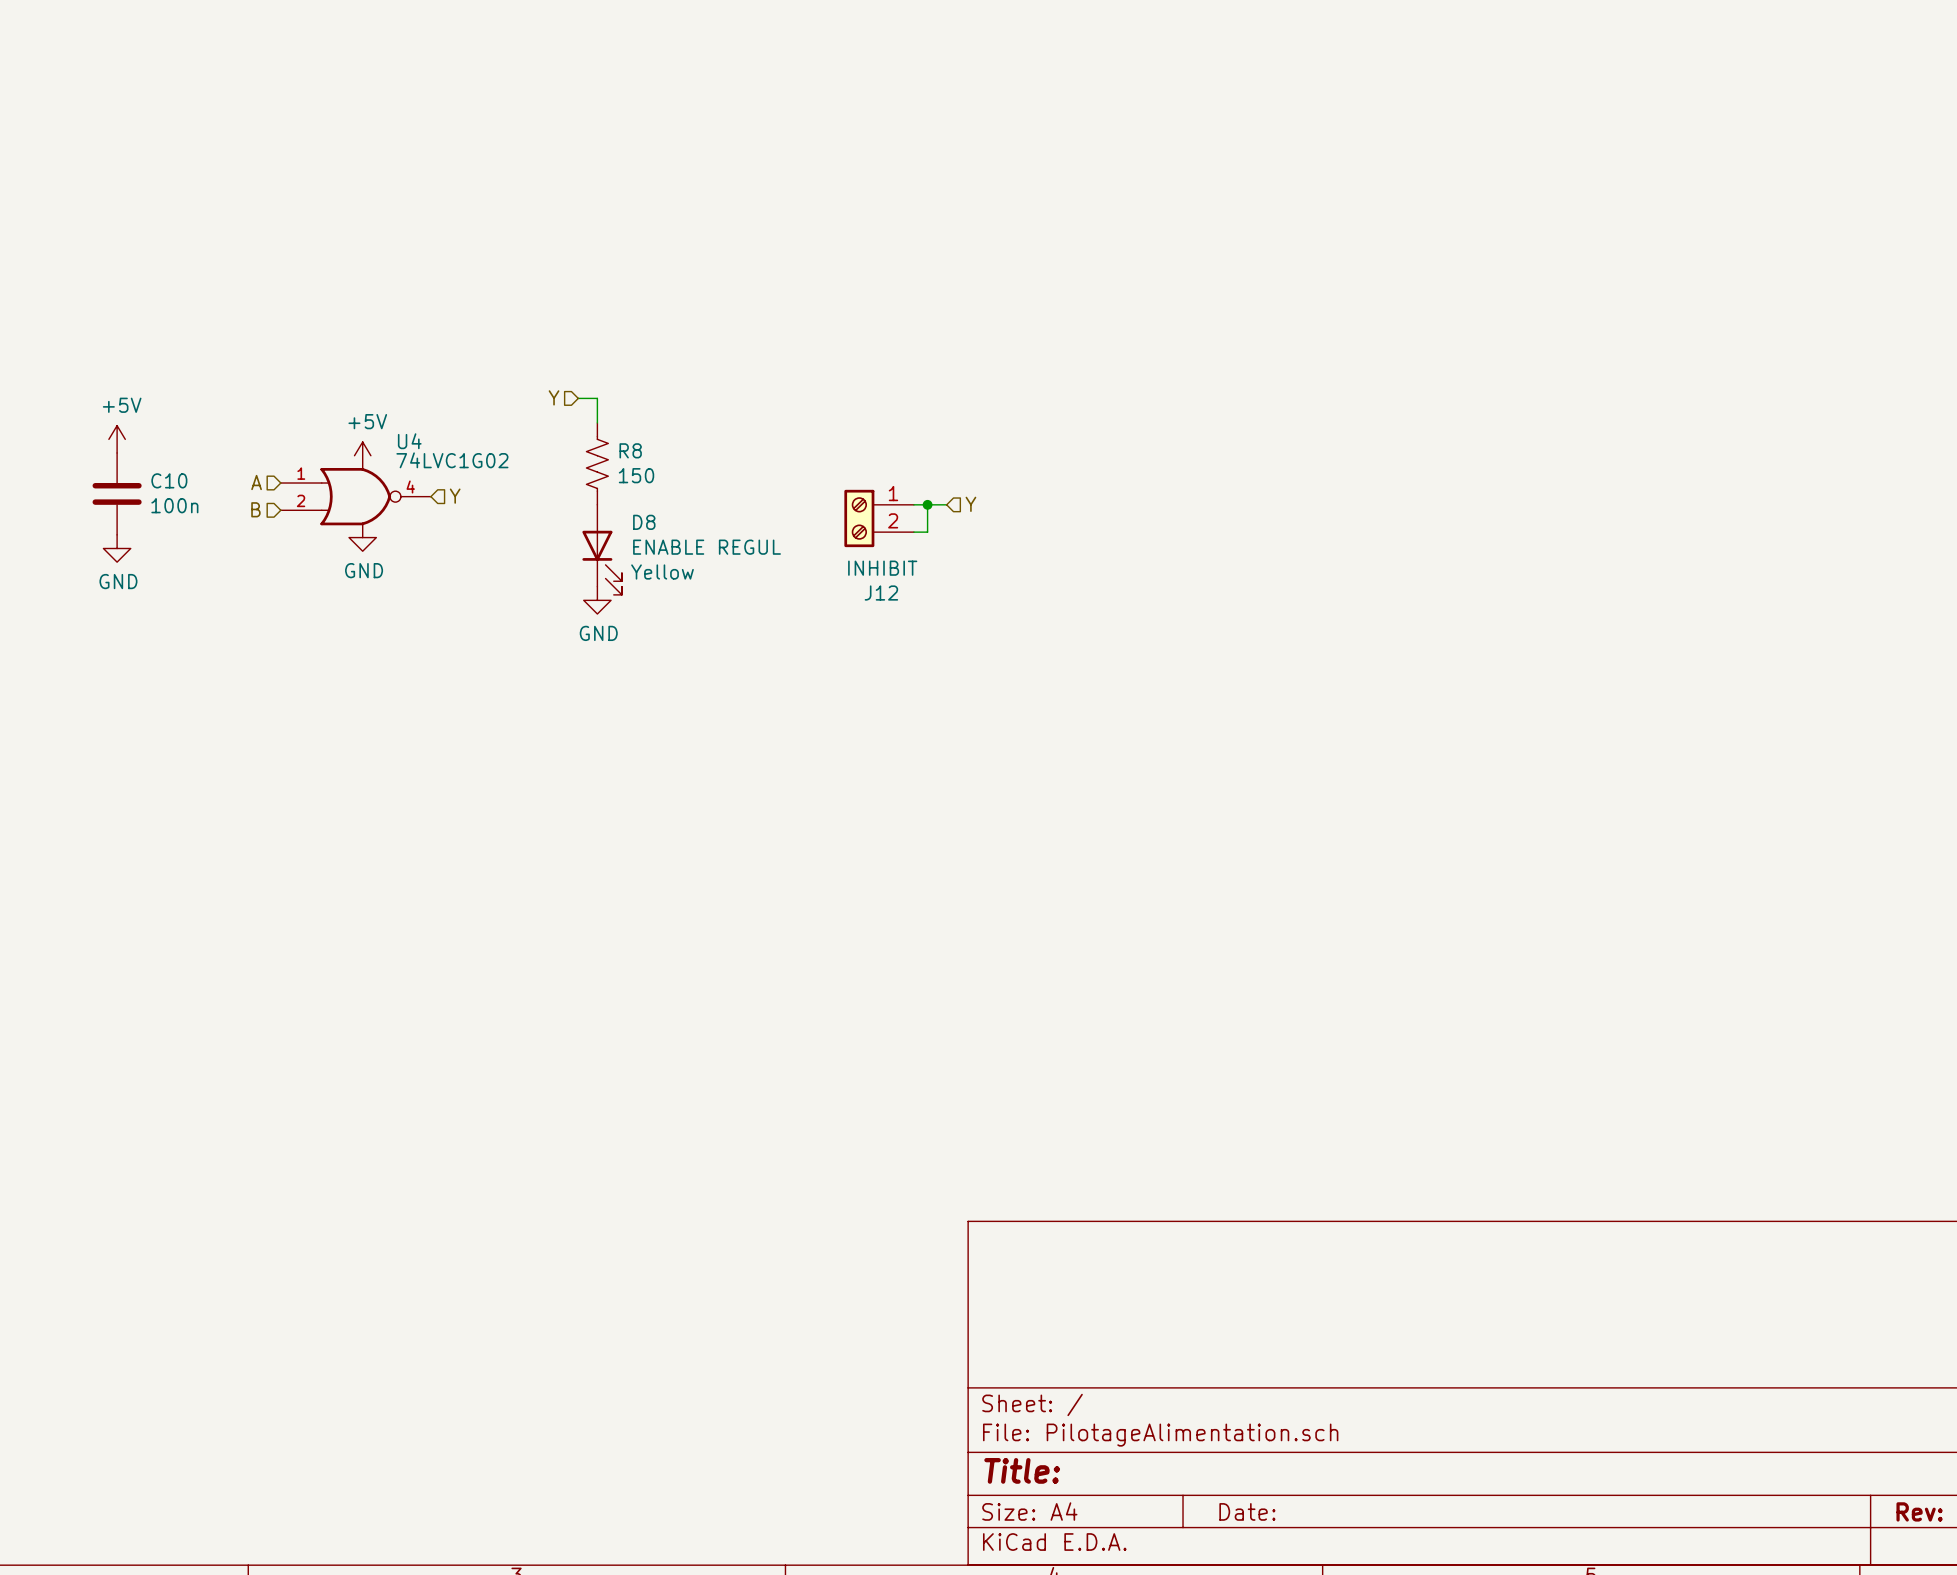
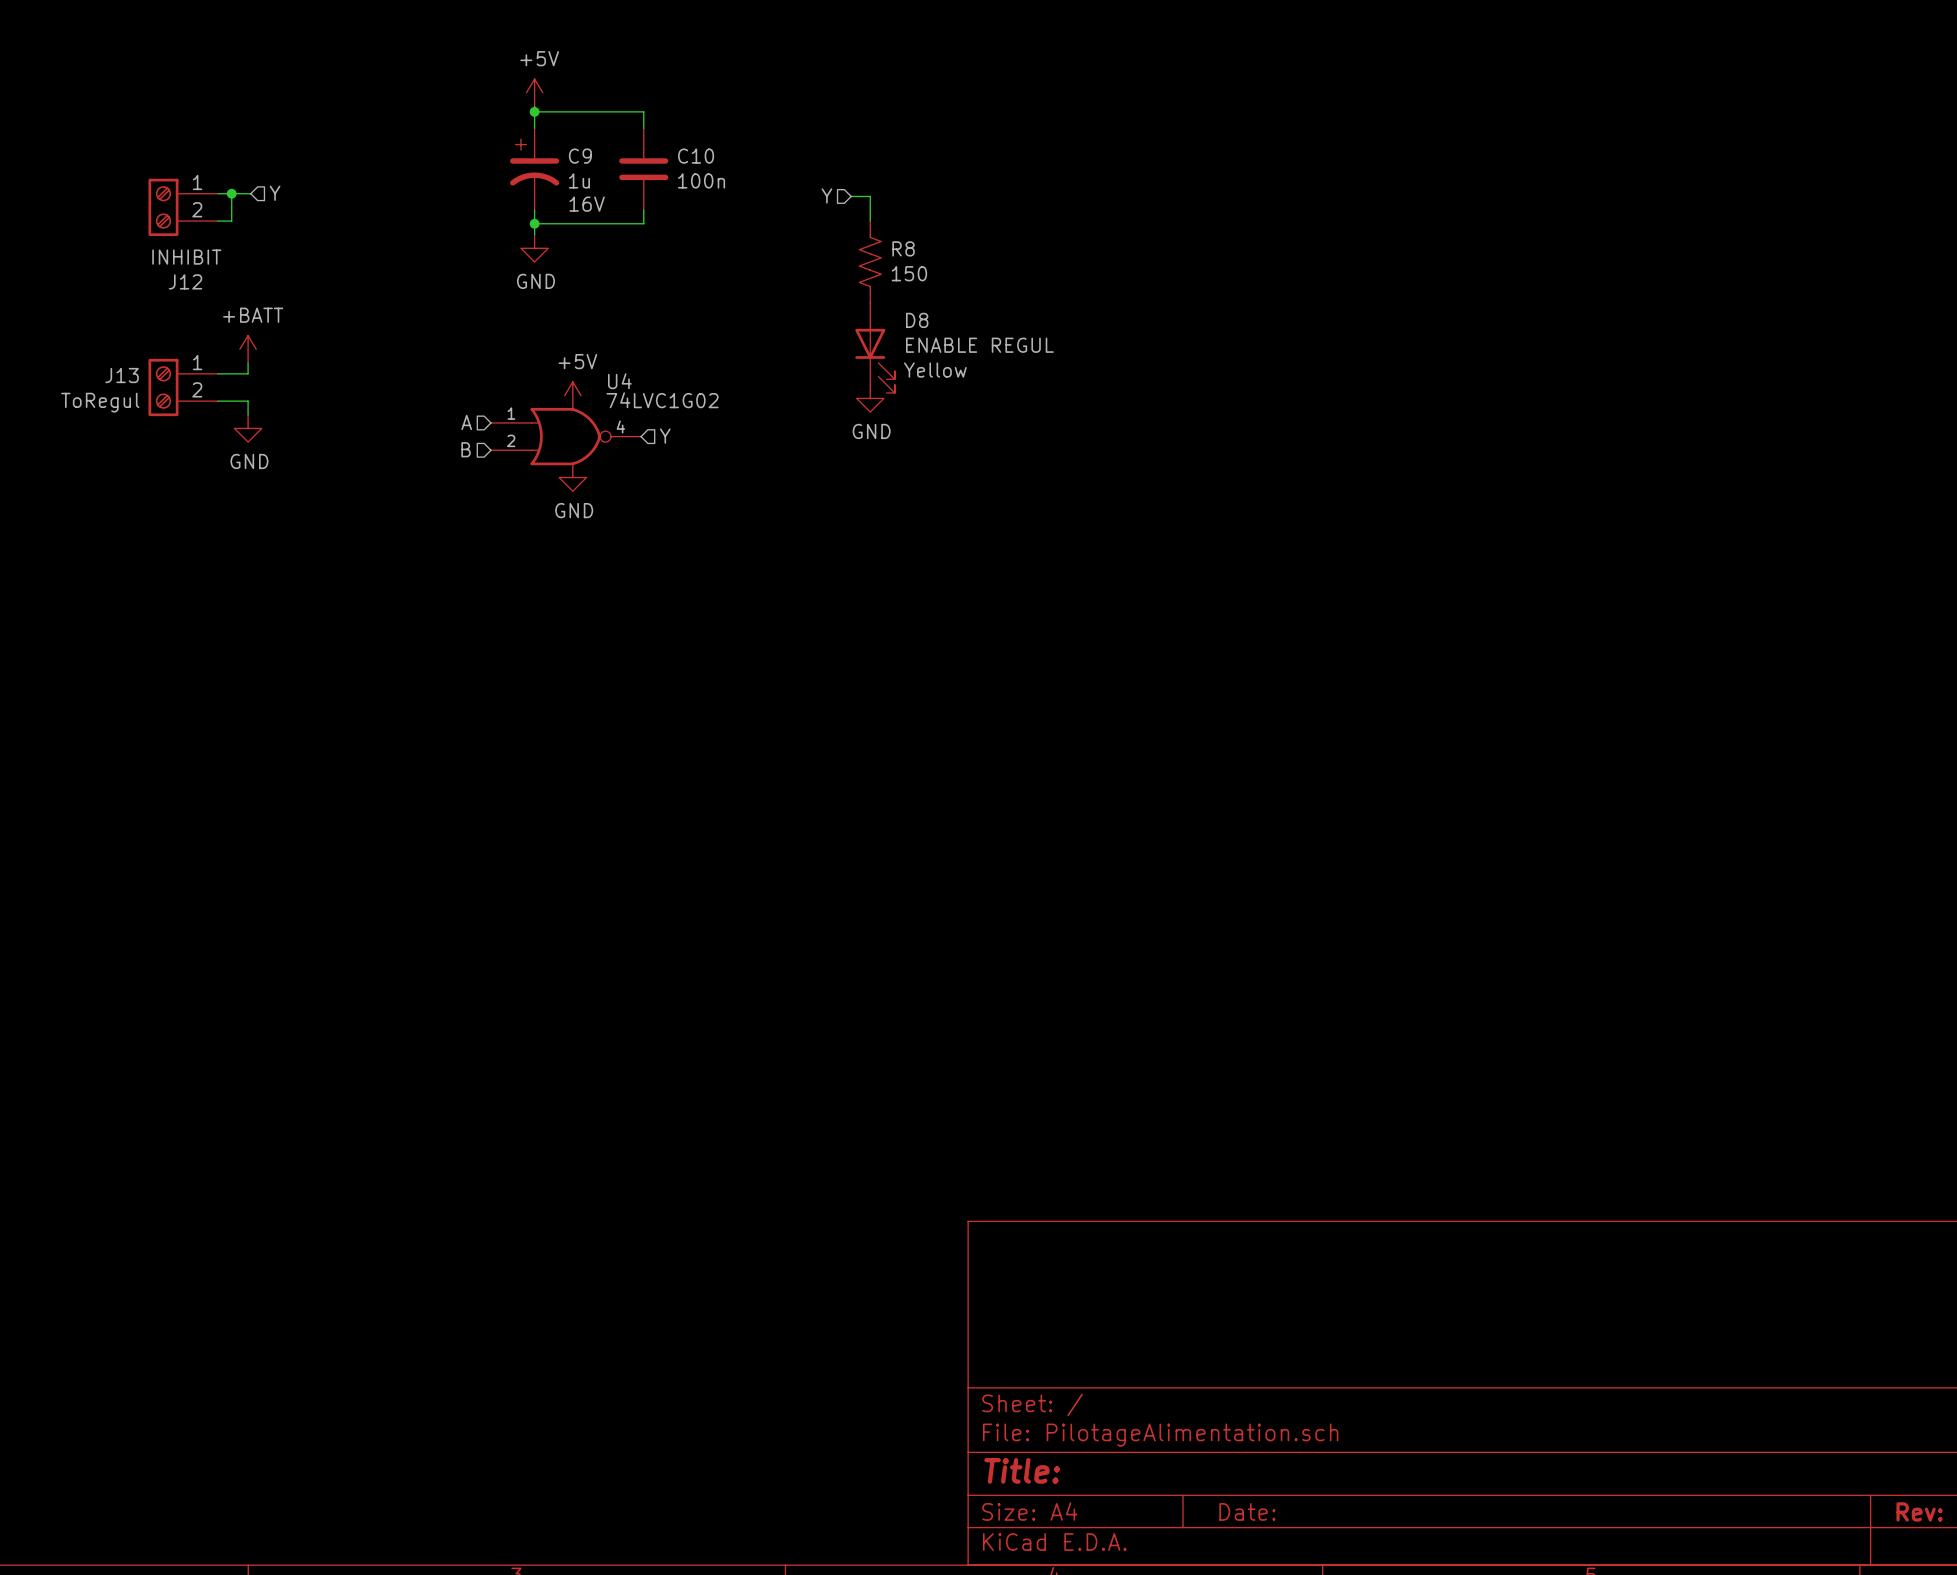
power symbol: none -> +5V (534, 92)
wire: none -> (534, 106) (534, 128)
wire: none -> (534, 111) (643, 111) (643, 128)
junction: none -> (534, 111)
C9: none -> 1u (534, 169)
wire: none -> (218, 193) (250, 193)
wire: none -> (231, 193) (231, 221) (218, 221)
junction: none -> (231, 193)
hierarchical label: none -> Y (275, 193)
hierarchical label: none -> Y (826, 195)
wire: none -> (851, 196) (870, 196) (870, 221)
wire: none -> (534, 210) (534, 234)
wire: none -> (643, 210) (643, 223) (534, 223)
junction: none -> (534, 223)
power symbol: none -> GND (534, 248)
power symbol: none -> +BATT (248, 349)
wire: none -> (248, 362) (248, 373) (218, 373)
J13: none -> ToRegul (183, 387)
power symbol: none -> +5V (572, 395)
hierarchical label rotation: 0° (554, 397) -> 180° (665, 436)
hierarchical label position: Y (554, 397) -> Y (665, 436)
wire: (578, 398) (597, 398) (597, 422) -> none
power symbol: none -> GND (870, 398)
wire: none -> (218, 401) (248, 401) (248, 414)
power symbol: none -> GND (248, 428)
power symbol: +5V (117, 439) -> none
power symbol: +5V (362, 455) -> none
R8 position: (597, 463) -> (870, 261)
power symbol: none -> GND (572, 477)
hierarchical label position: A (256, 482) -> A (466, 422)
C10 position: (117, 493) -> (643, 169)
U4 position: (355, 496) -> (566, 436)
hierarchical label: Y (455, 496) -> none
wire: (913, 504) (946, 504) -> none
wire: (927, 504) (927, 532) (913, 532) -> none
junction: (927, 504) -> none
hierarchical label: Y (970, 504) -> none
hierarchical label position: B (255, 509) -> B (466, 449)
J12 position: (879, 518) -> (183, 207)
power symbol: GND (362, 537) -> none
power symbol: GND (117, 548) -> none
D8 position: (602, 549) -> (875, 347)
power symbol: GND (597, 600) -> none

